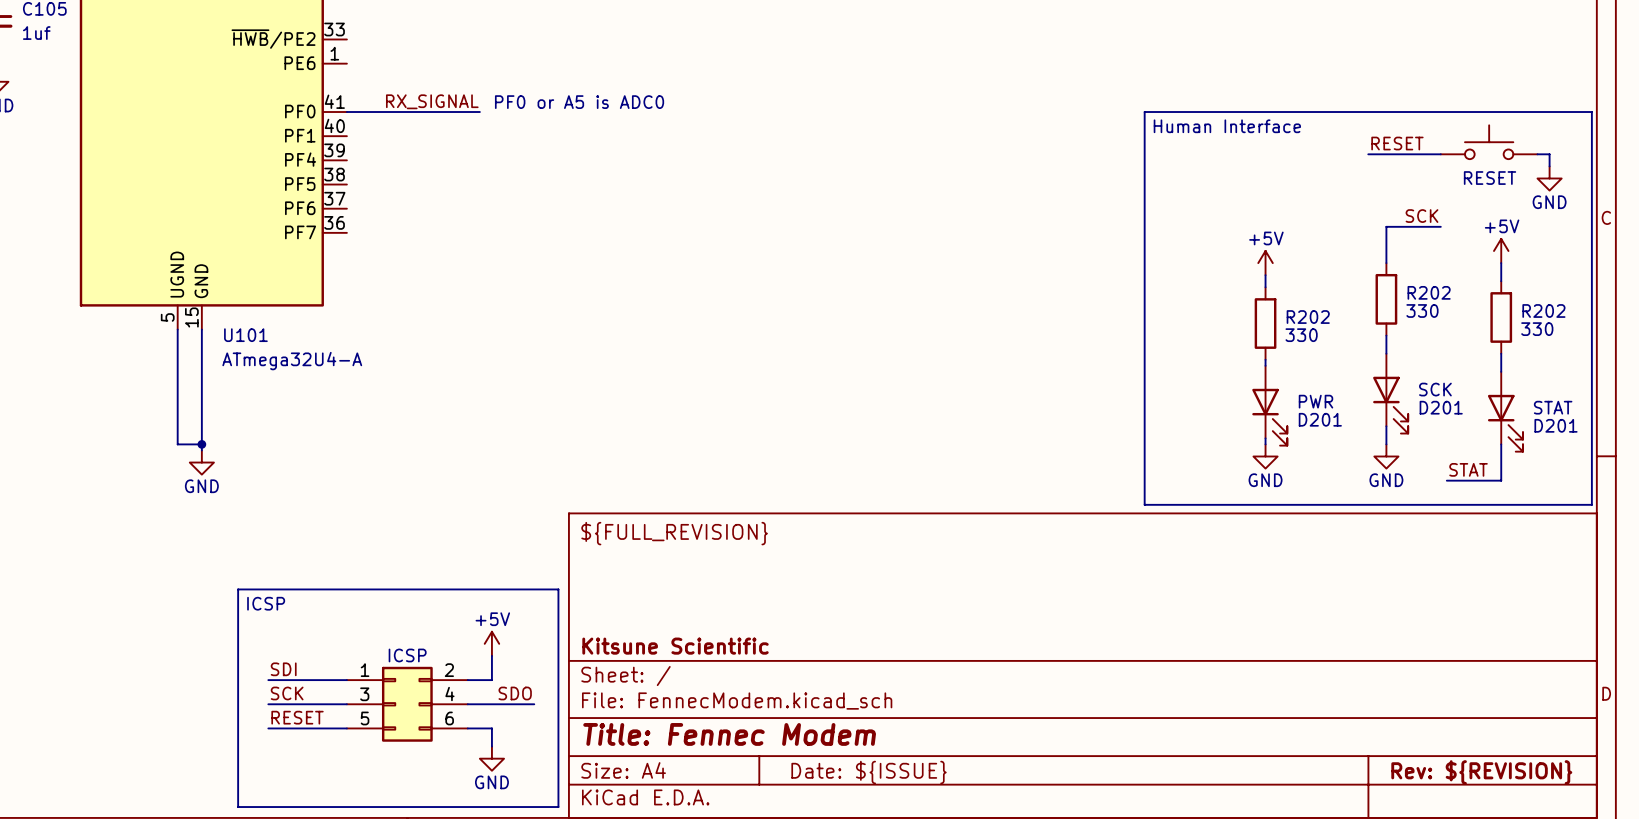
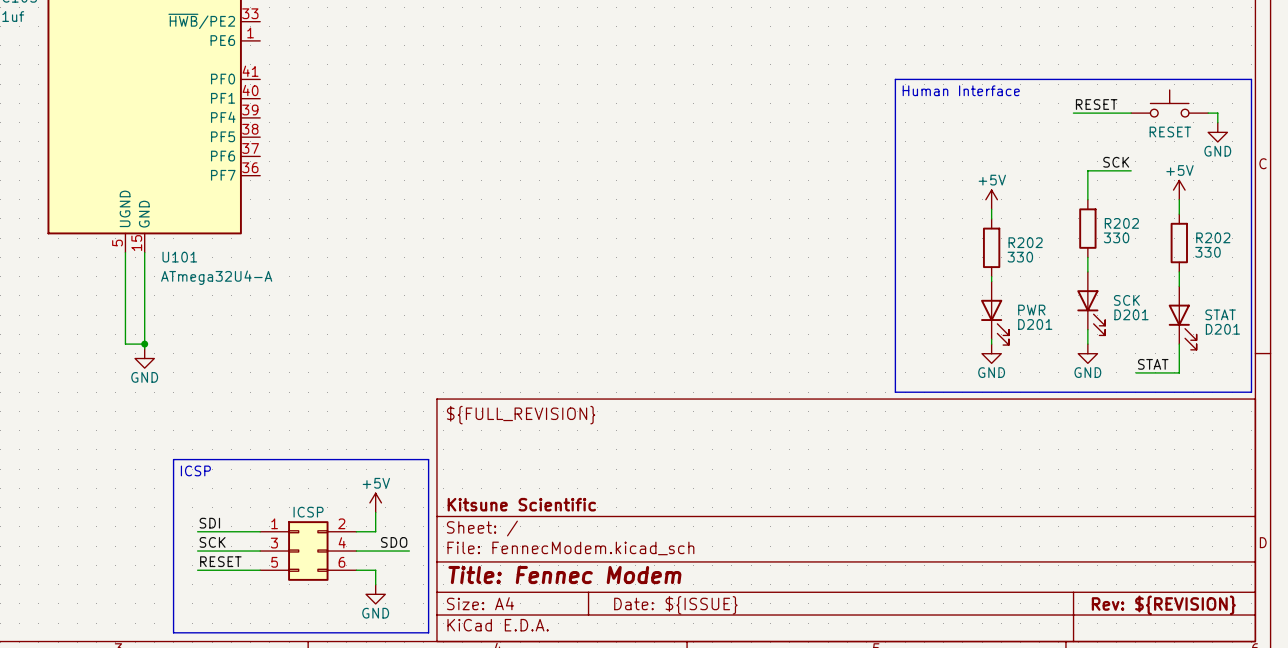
label: RX_SIGNAL (432, 101) -> none
text: PF0 or A5 is ADC0 (579, 102) -> none
wire: (346, 112) (479, 112) -> none

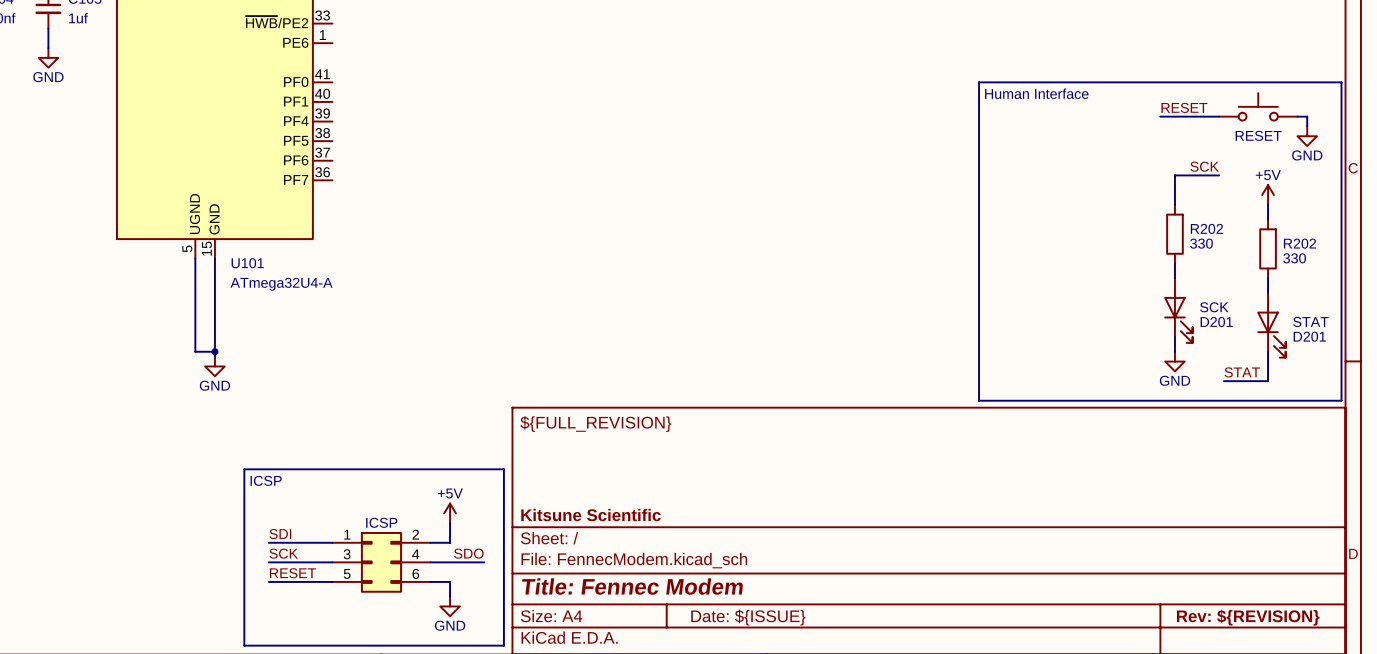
power symbol: +5V (991, 199) -> none
wire: (991, 209) (991, 218) -> none
R202: 330 (991, 247) -> none
wire: (991, 276) (991, 281) -> none
D201: PWR (994, 313) -> none
wire: (991, 339) (991, 344) -> none
power symbol: GND (991, 353) -> none

